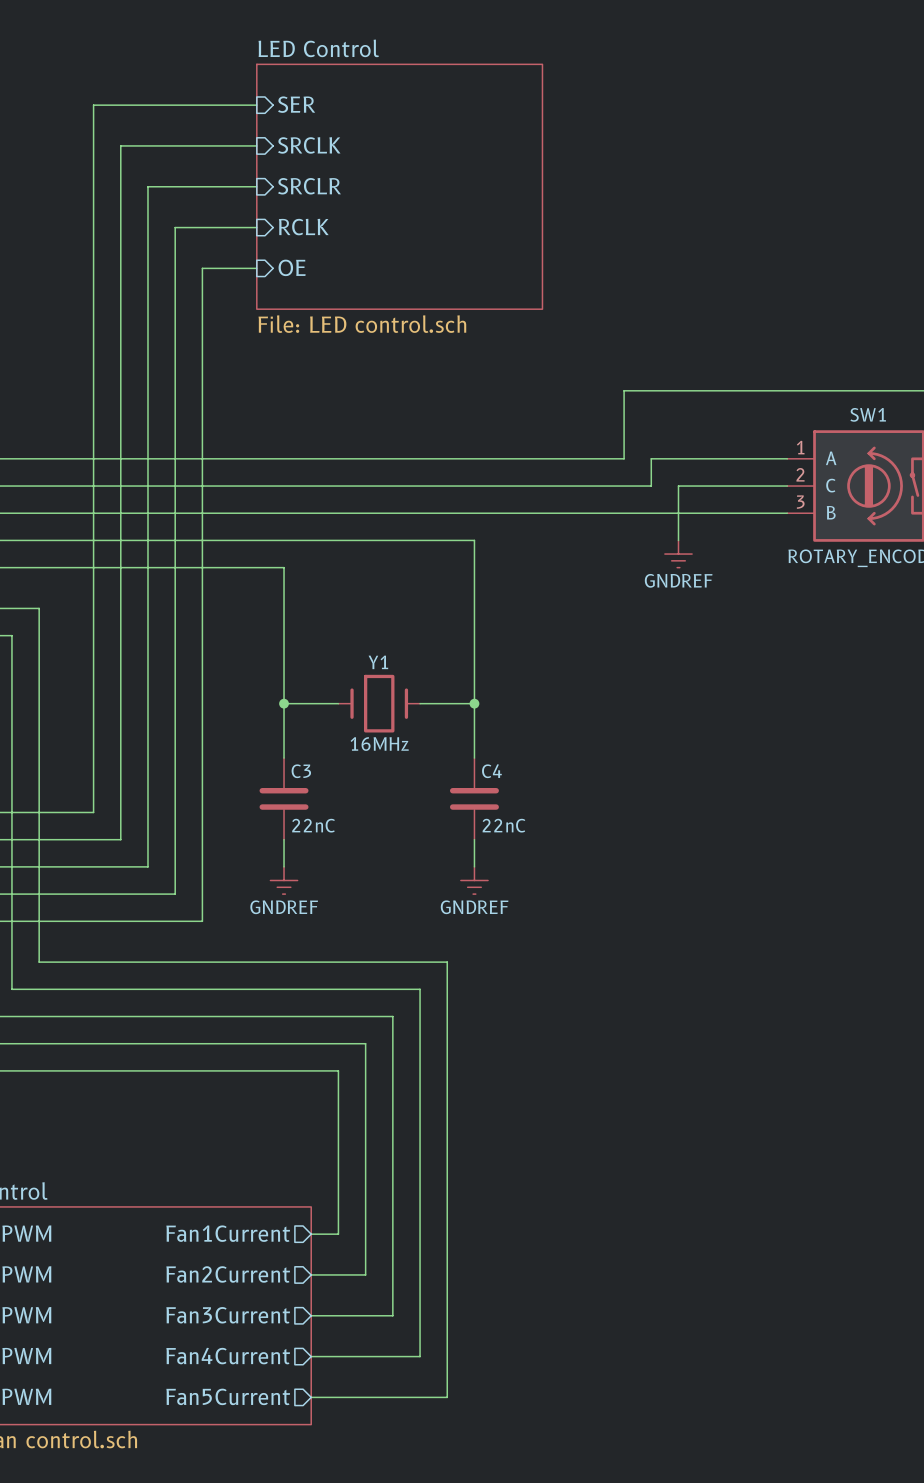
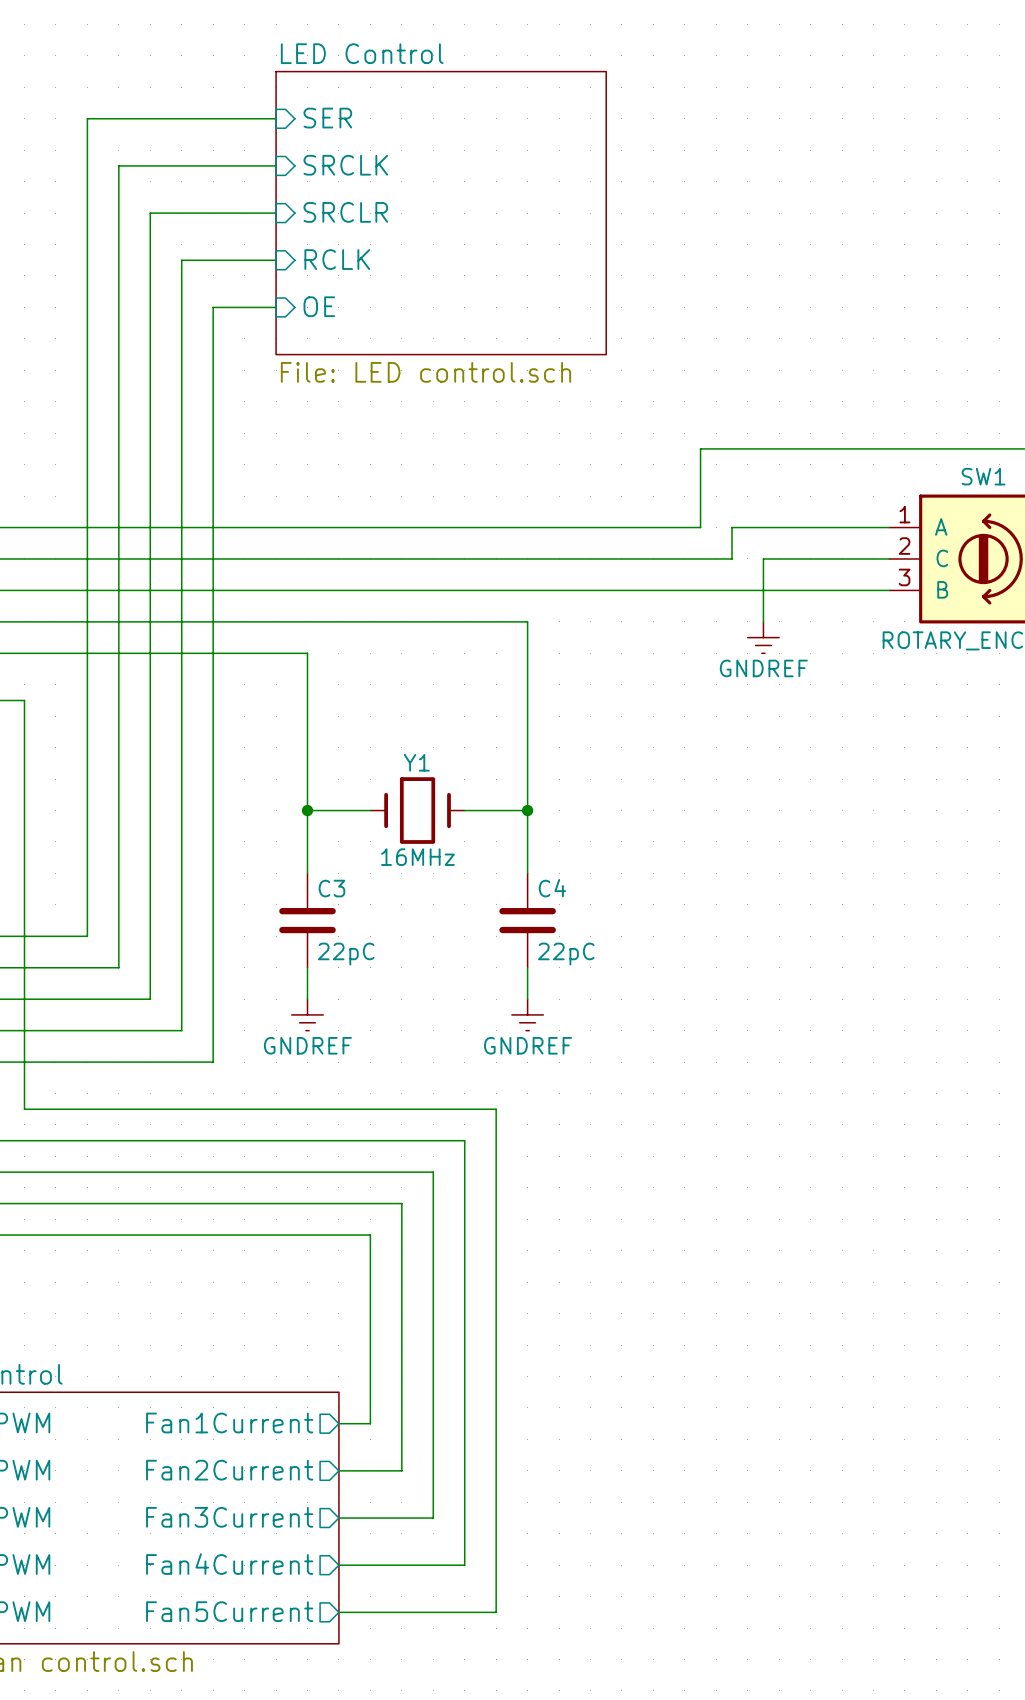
C3 value: 22nC (313, 825) -> 22pC (346, 954)
C4 value: 22nC (503, 825) -> 22pC (566, 954)

